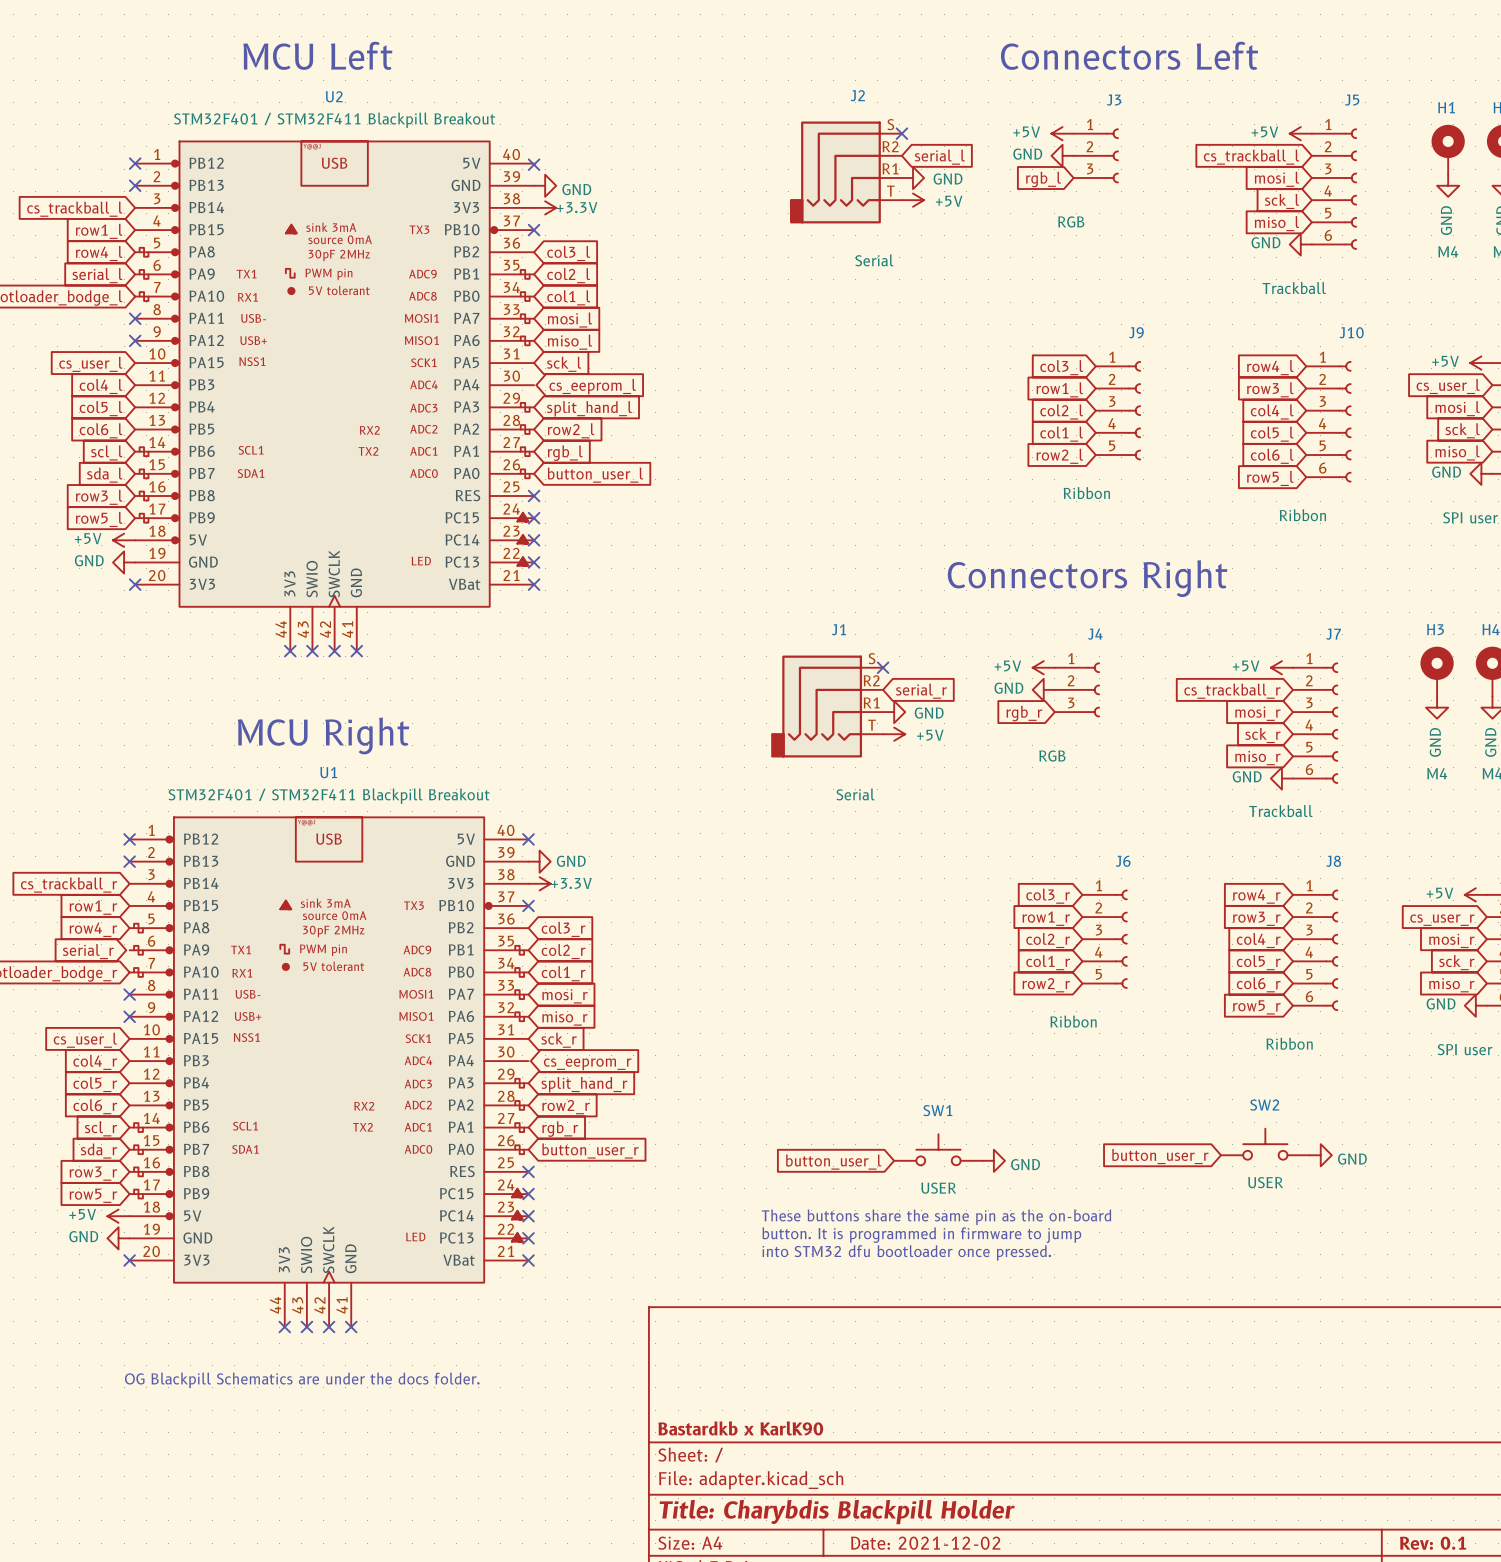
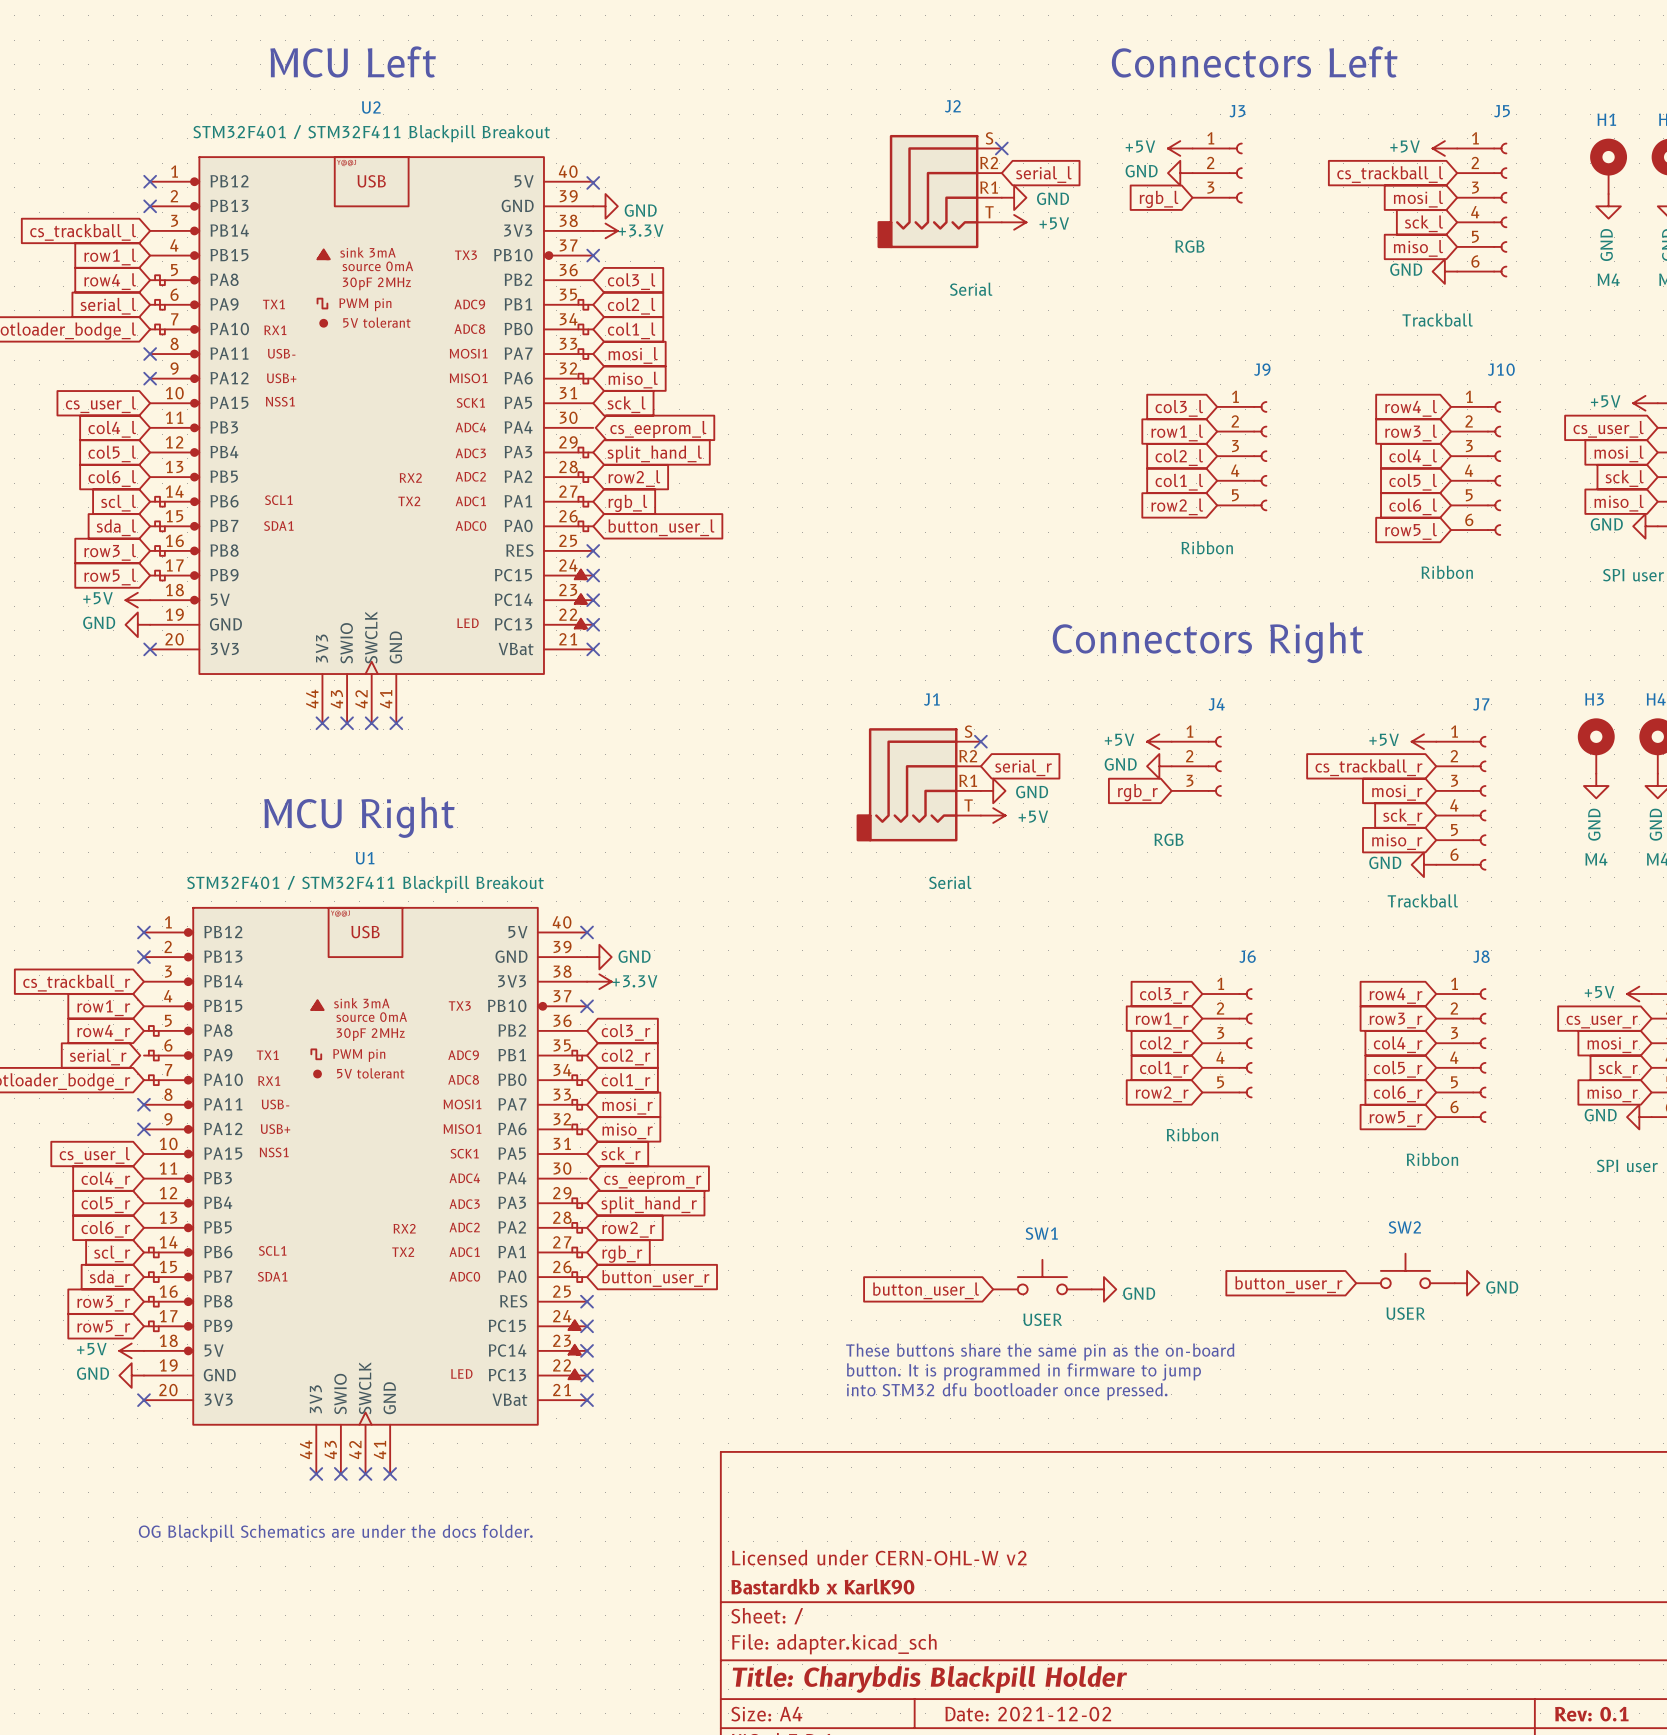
title block: none -> Licensed under CERN-OHL-W v2 (879, 1557)

